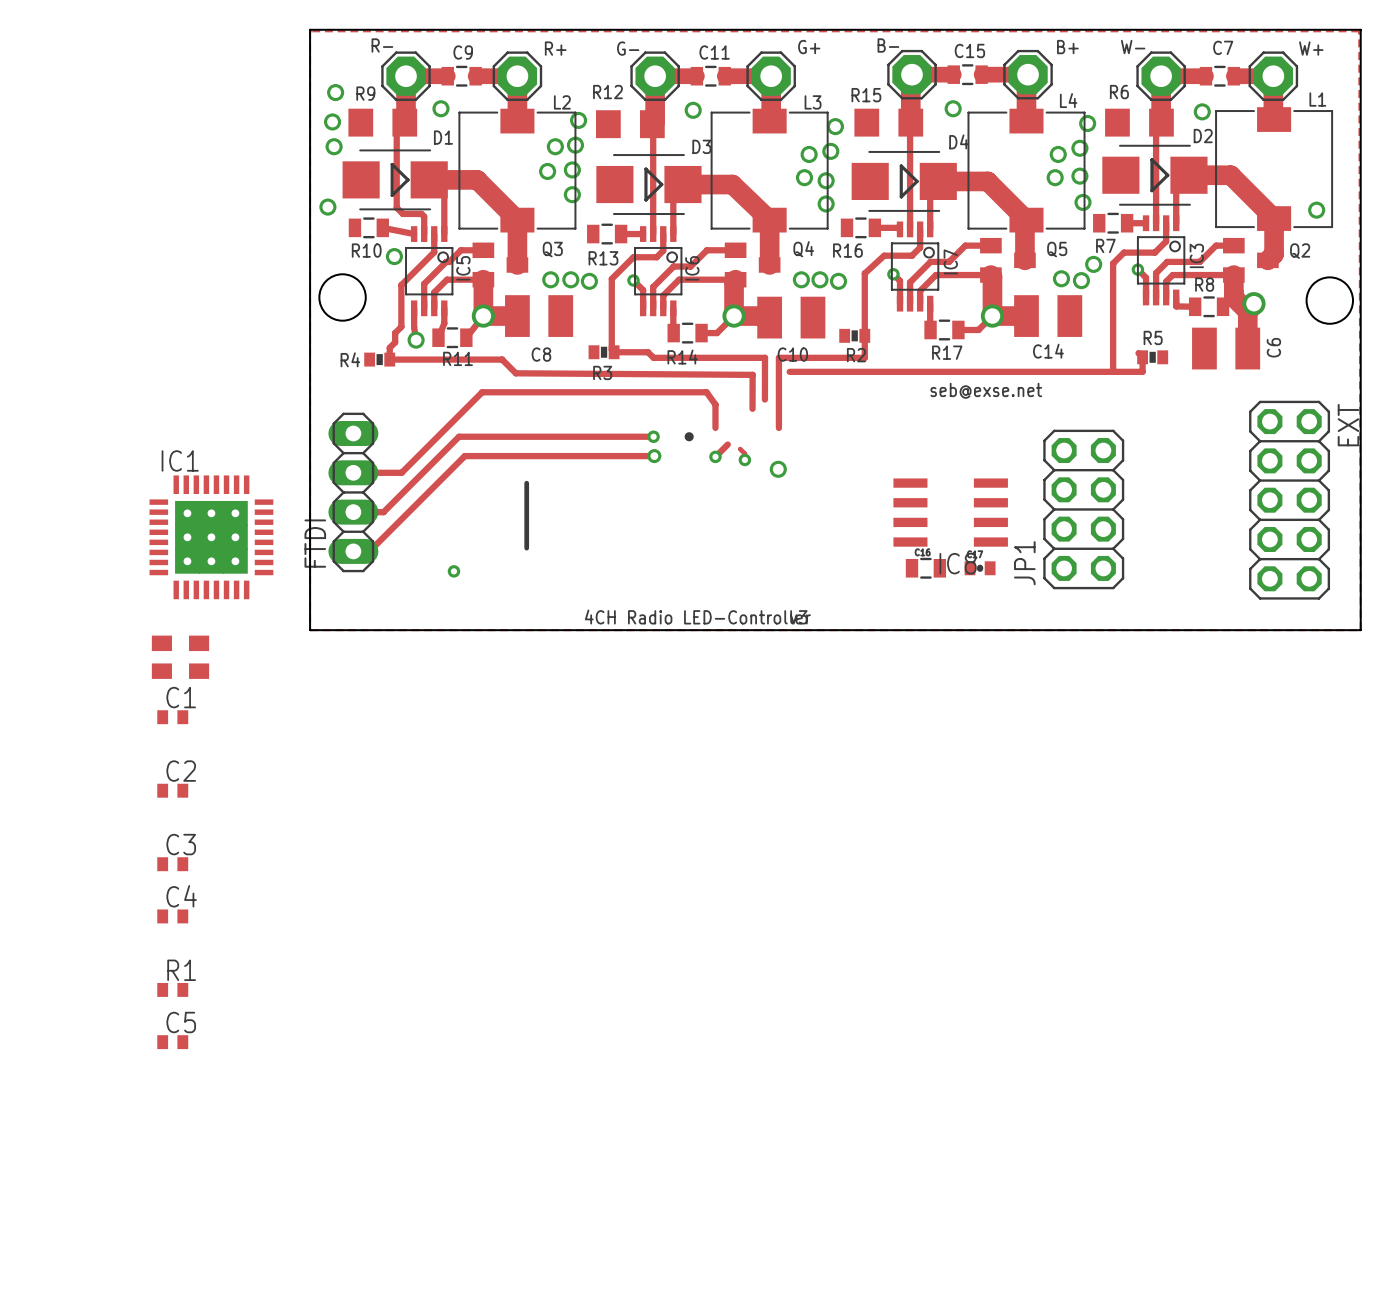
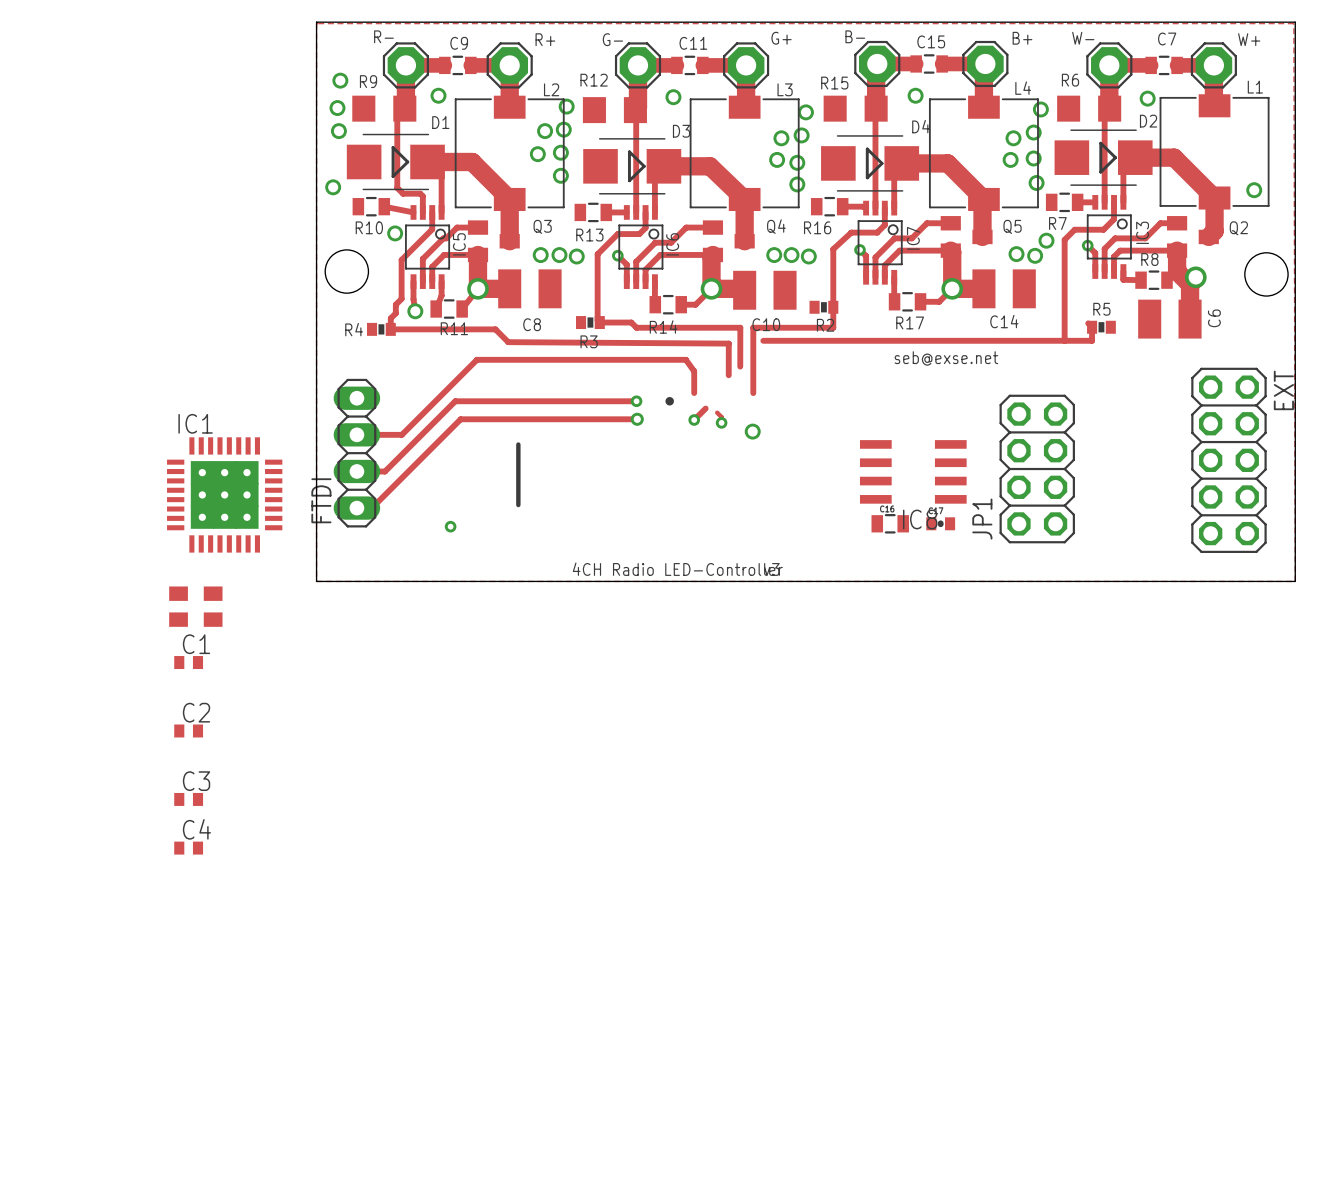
R1: (172, 989) -> none
C5: (172, 1042) -> none

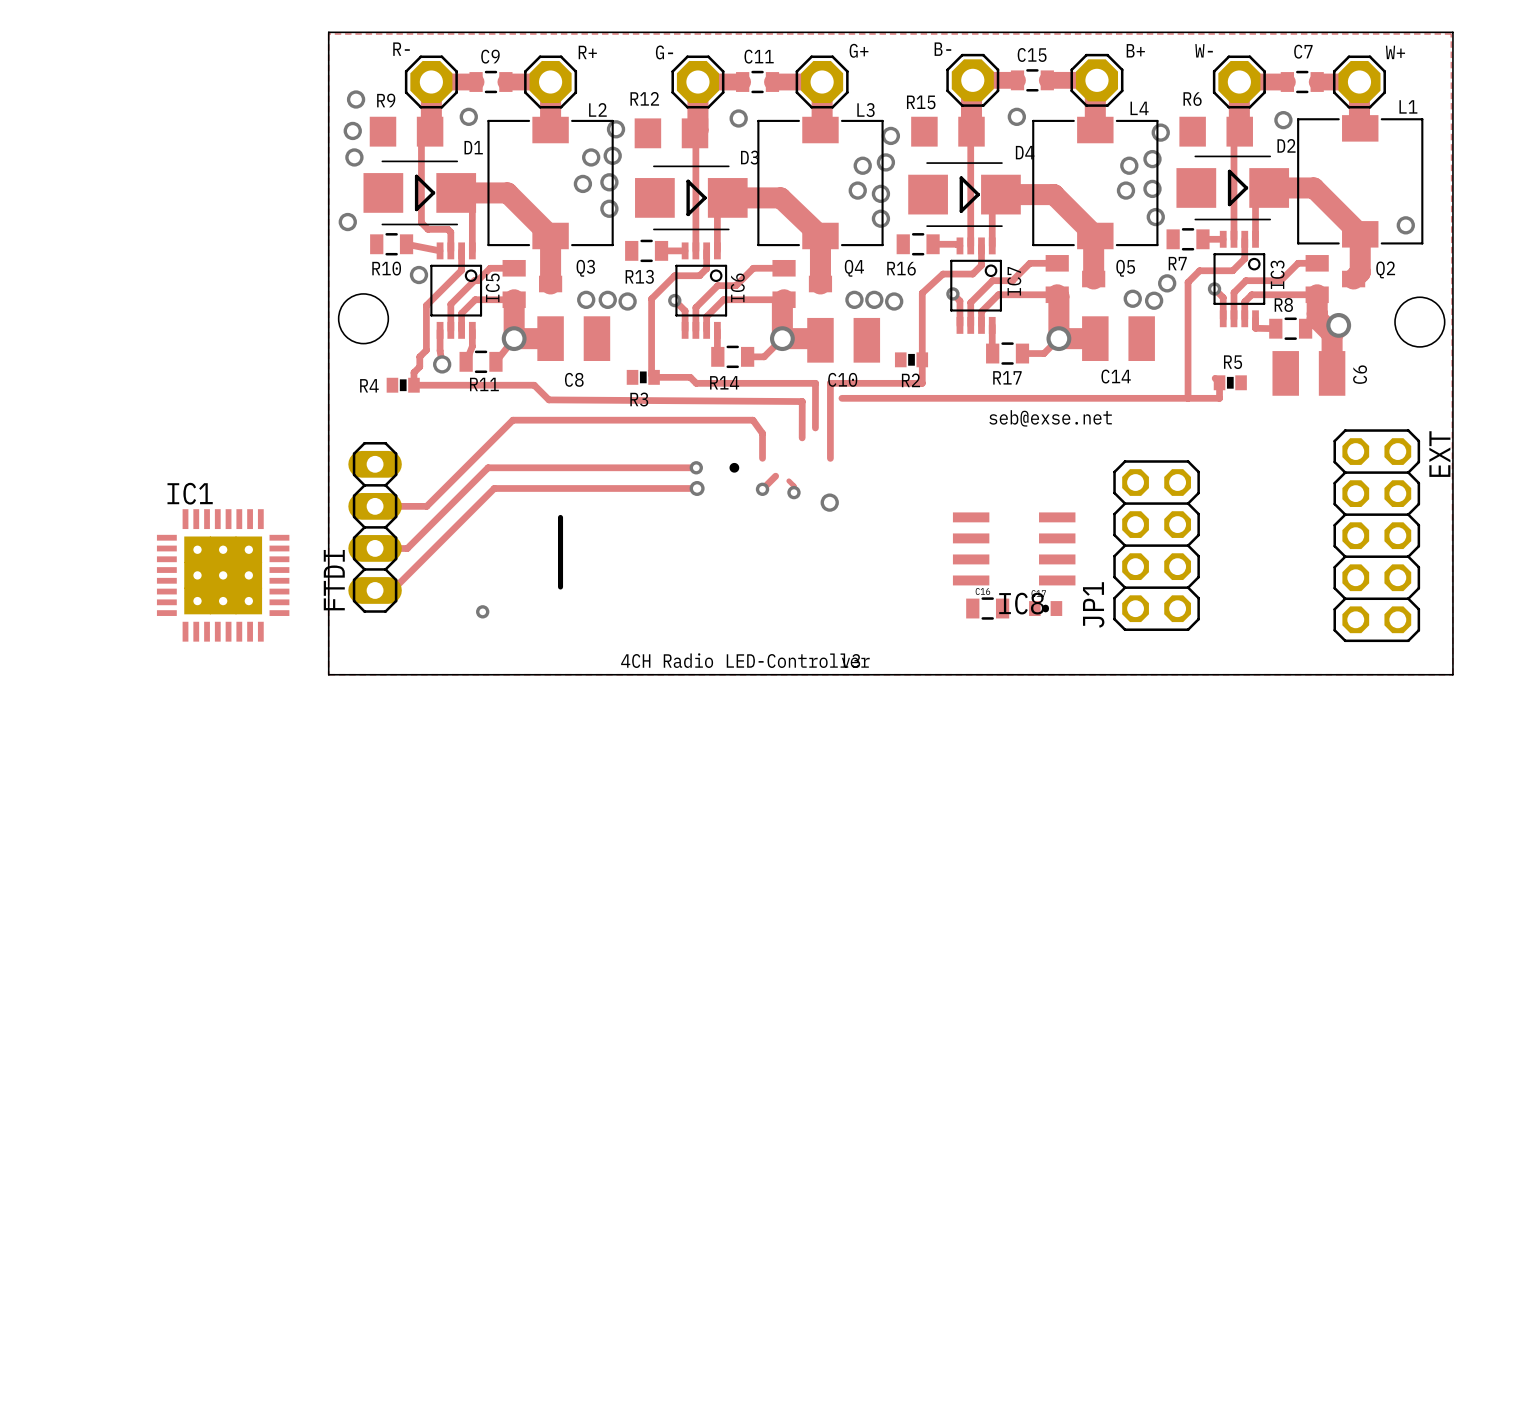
part: (195, 606) -> none
C1: (188, 662) -> none
C2: (188, 730) -> none
C3: (188, 799) -> none
C4: (188, 848) -> none

